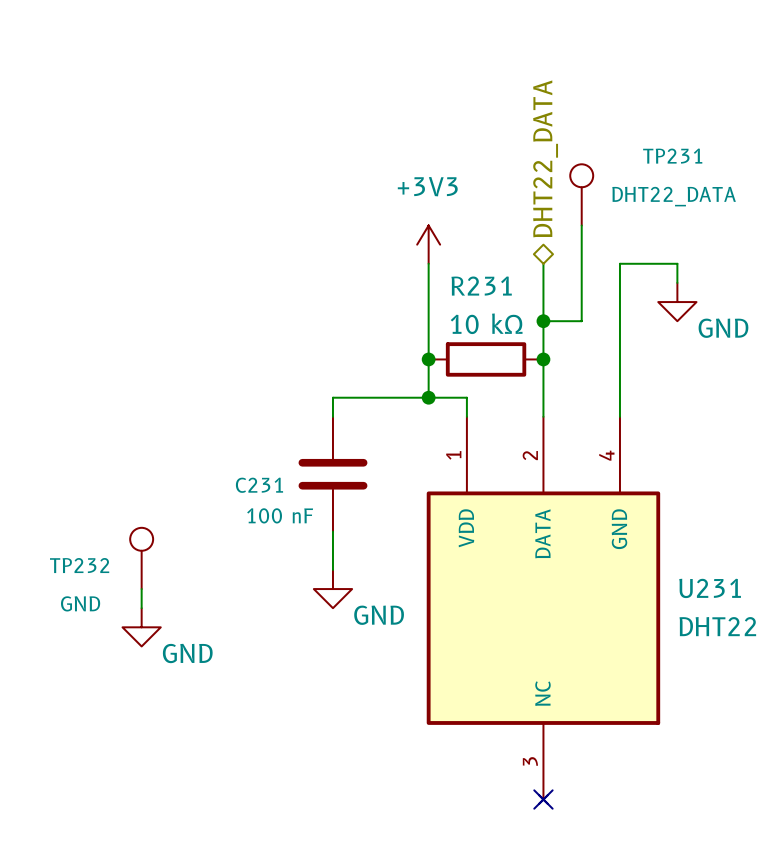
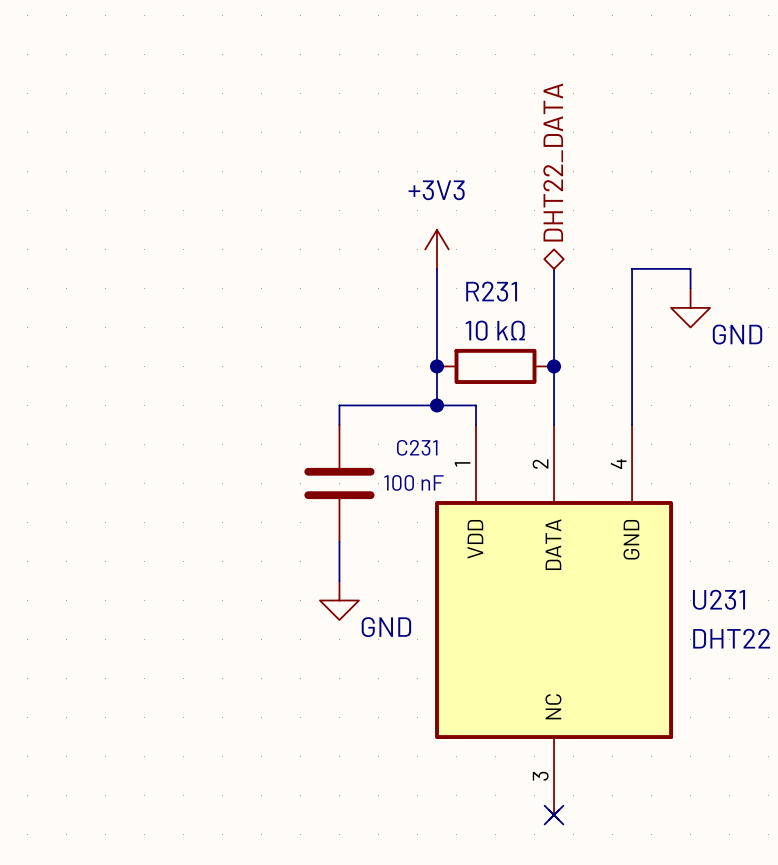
TP231: DHT22_DATA (581, 194) -> none
wire: (581, 225) (581, 321) (543, 321) -> none
junction: (543, 321) -> none
C231 name position: C231 (259, 485) -> C231 (417, 447)
C231 value position: 100 nF (280, 515) -> 100 nF (413, 482)
TP232: GND (141, 558) -> none
wire: (141, 589) (141, 608) -> none
power symbol: GND (141, 627) -> none

